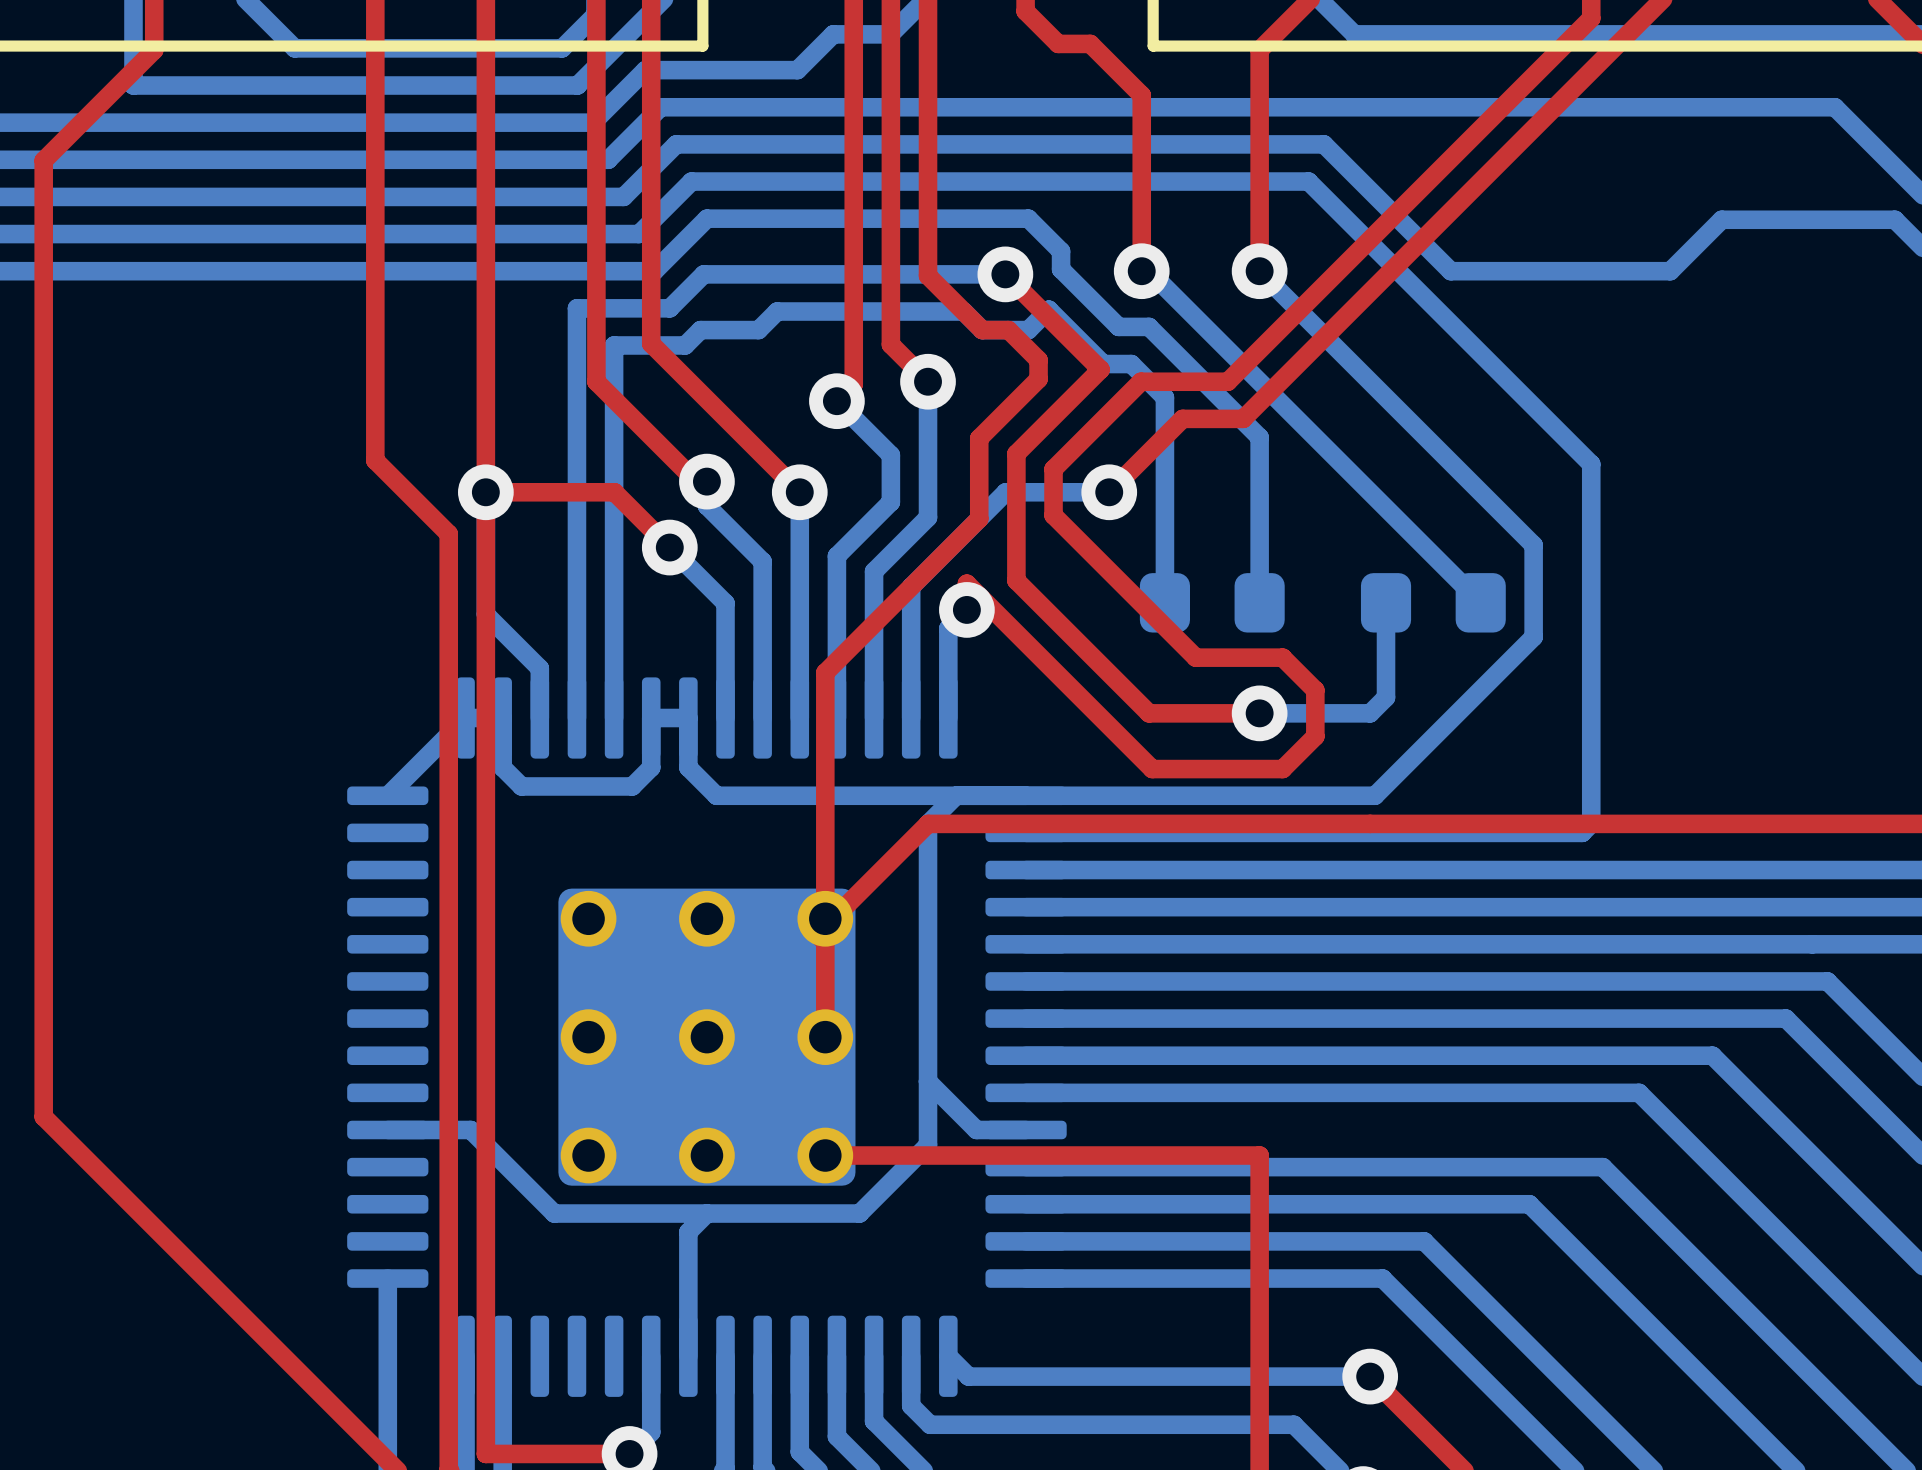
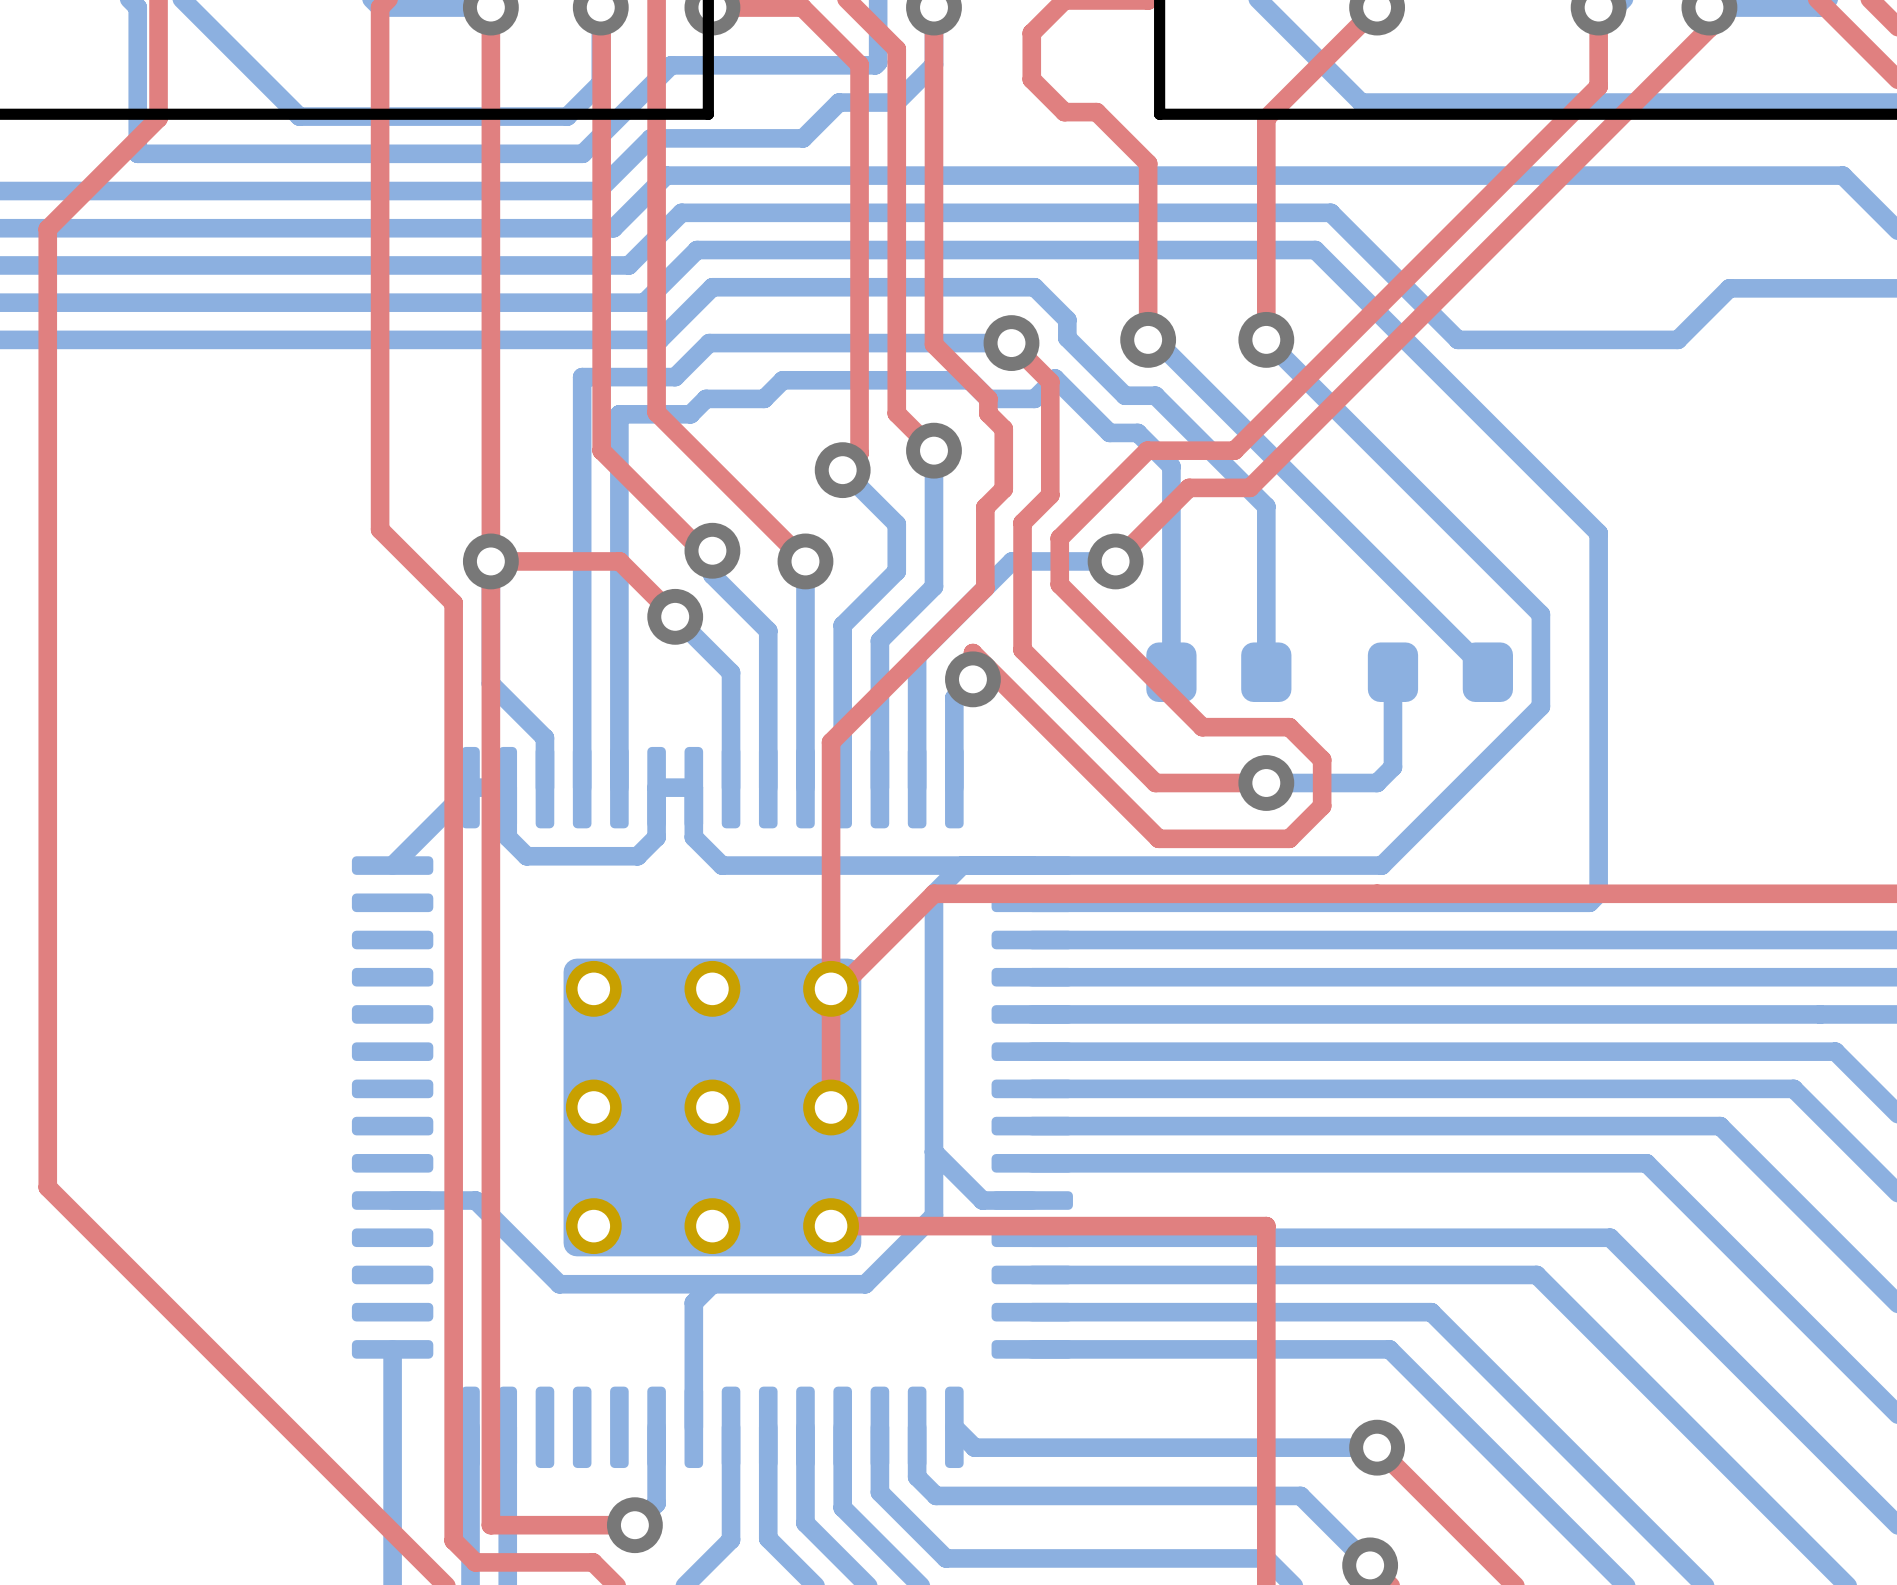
top track: (1044, 313) (1100, 369) (1044, 426) -> (1050, 381) (1050, 495)
top track: (982, 330) (1008, 330) (1038, 360) (1038, 379) (997, 420) -> (988, 398) (988, 413) (1003, 428) (1003, 489)

